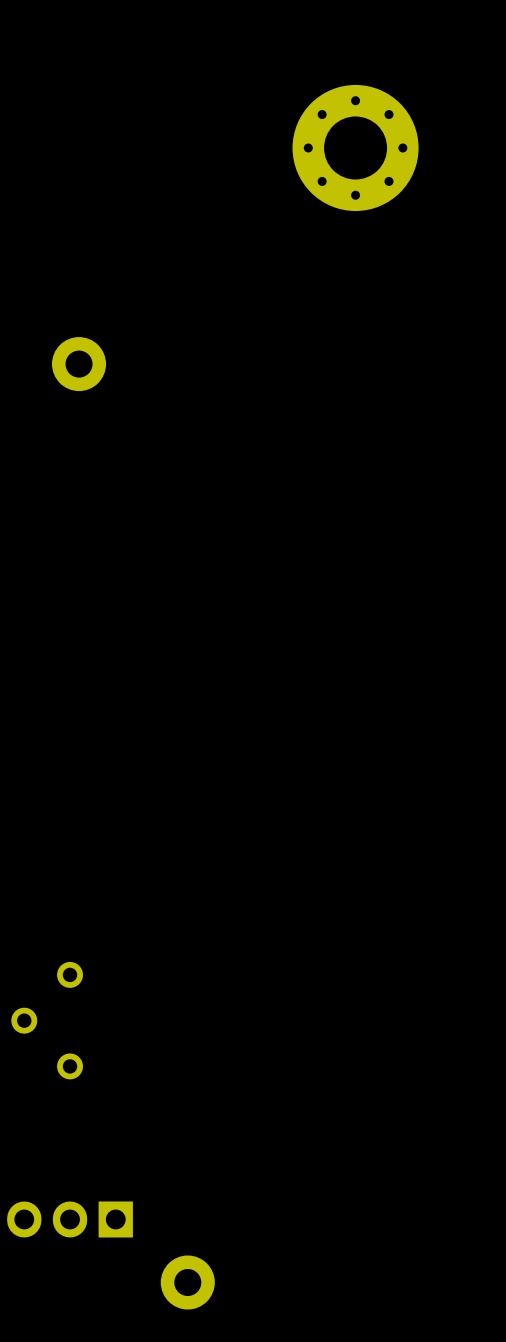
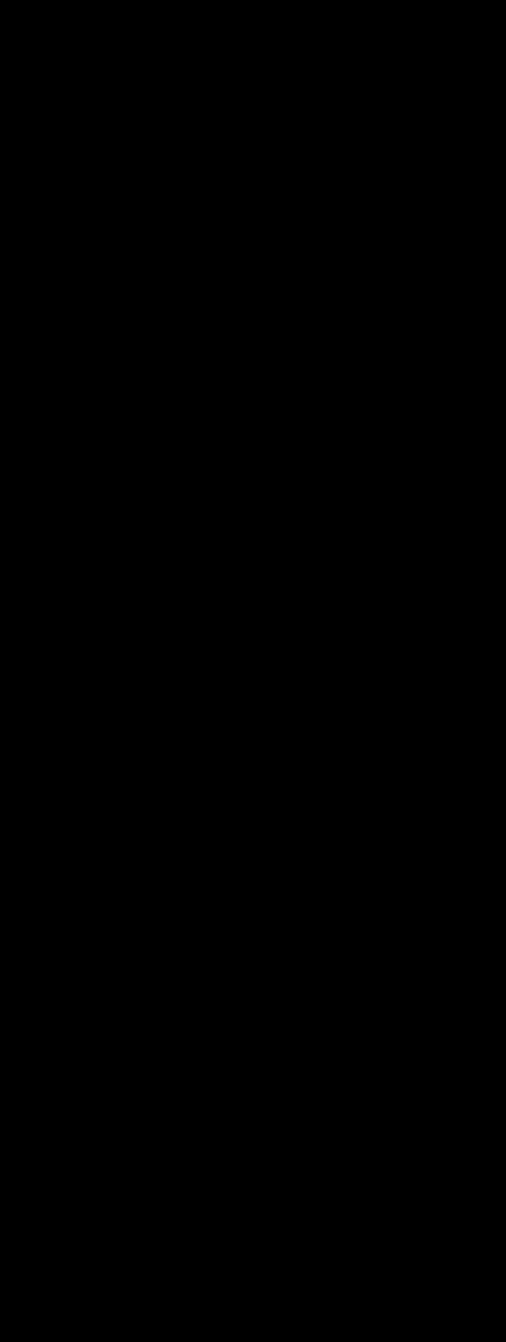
part: (355, 147) -> none
part: (79, 364) -> none
part: (47, 1020) -> none
part: (70, 1219) -> none
part: (187, 1282) -> none

